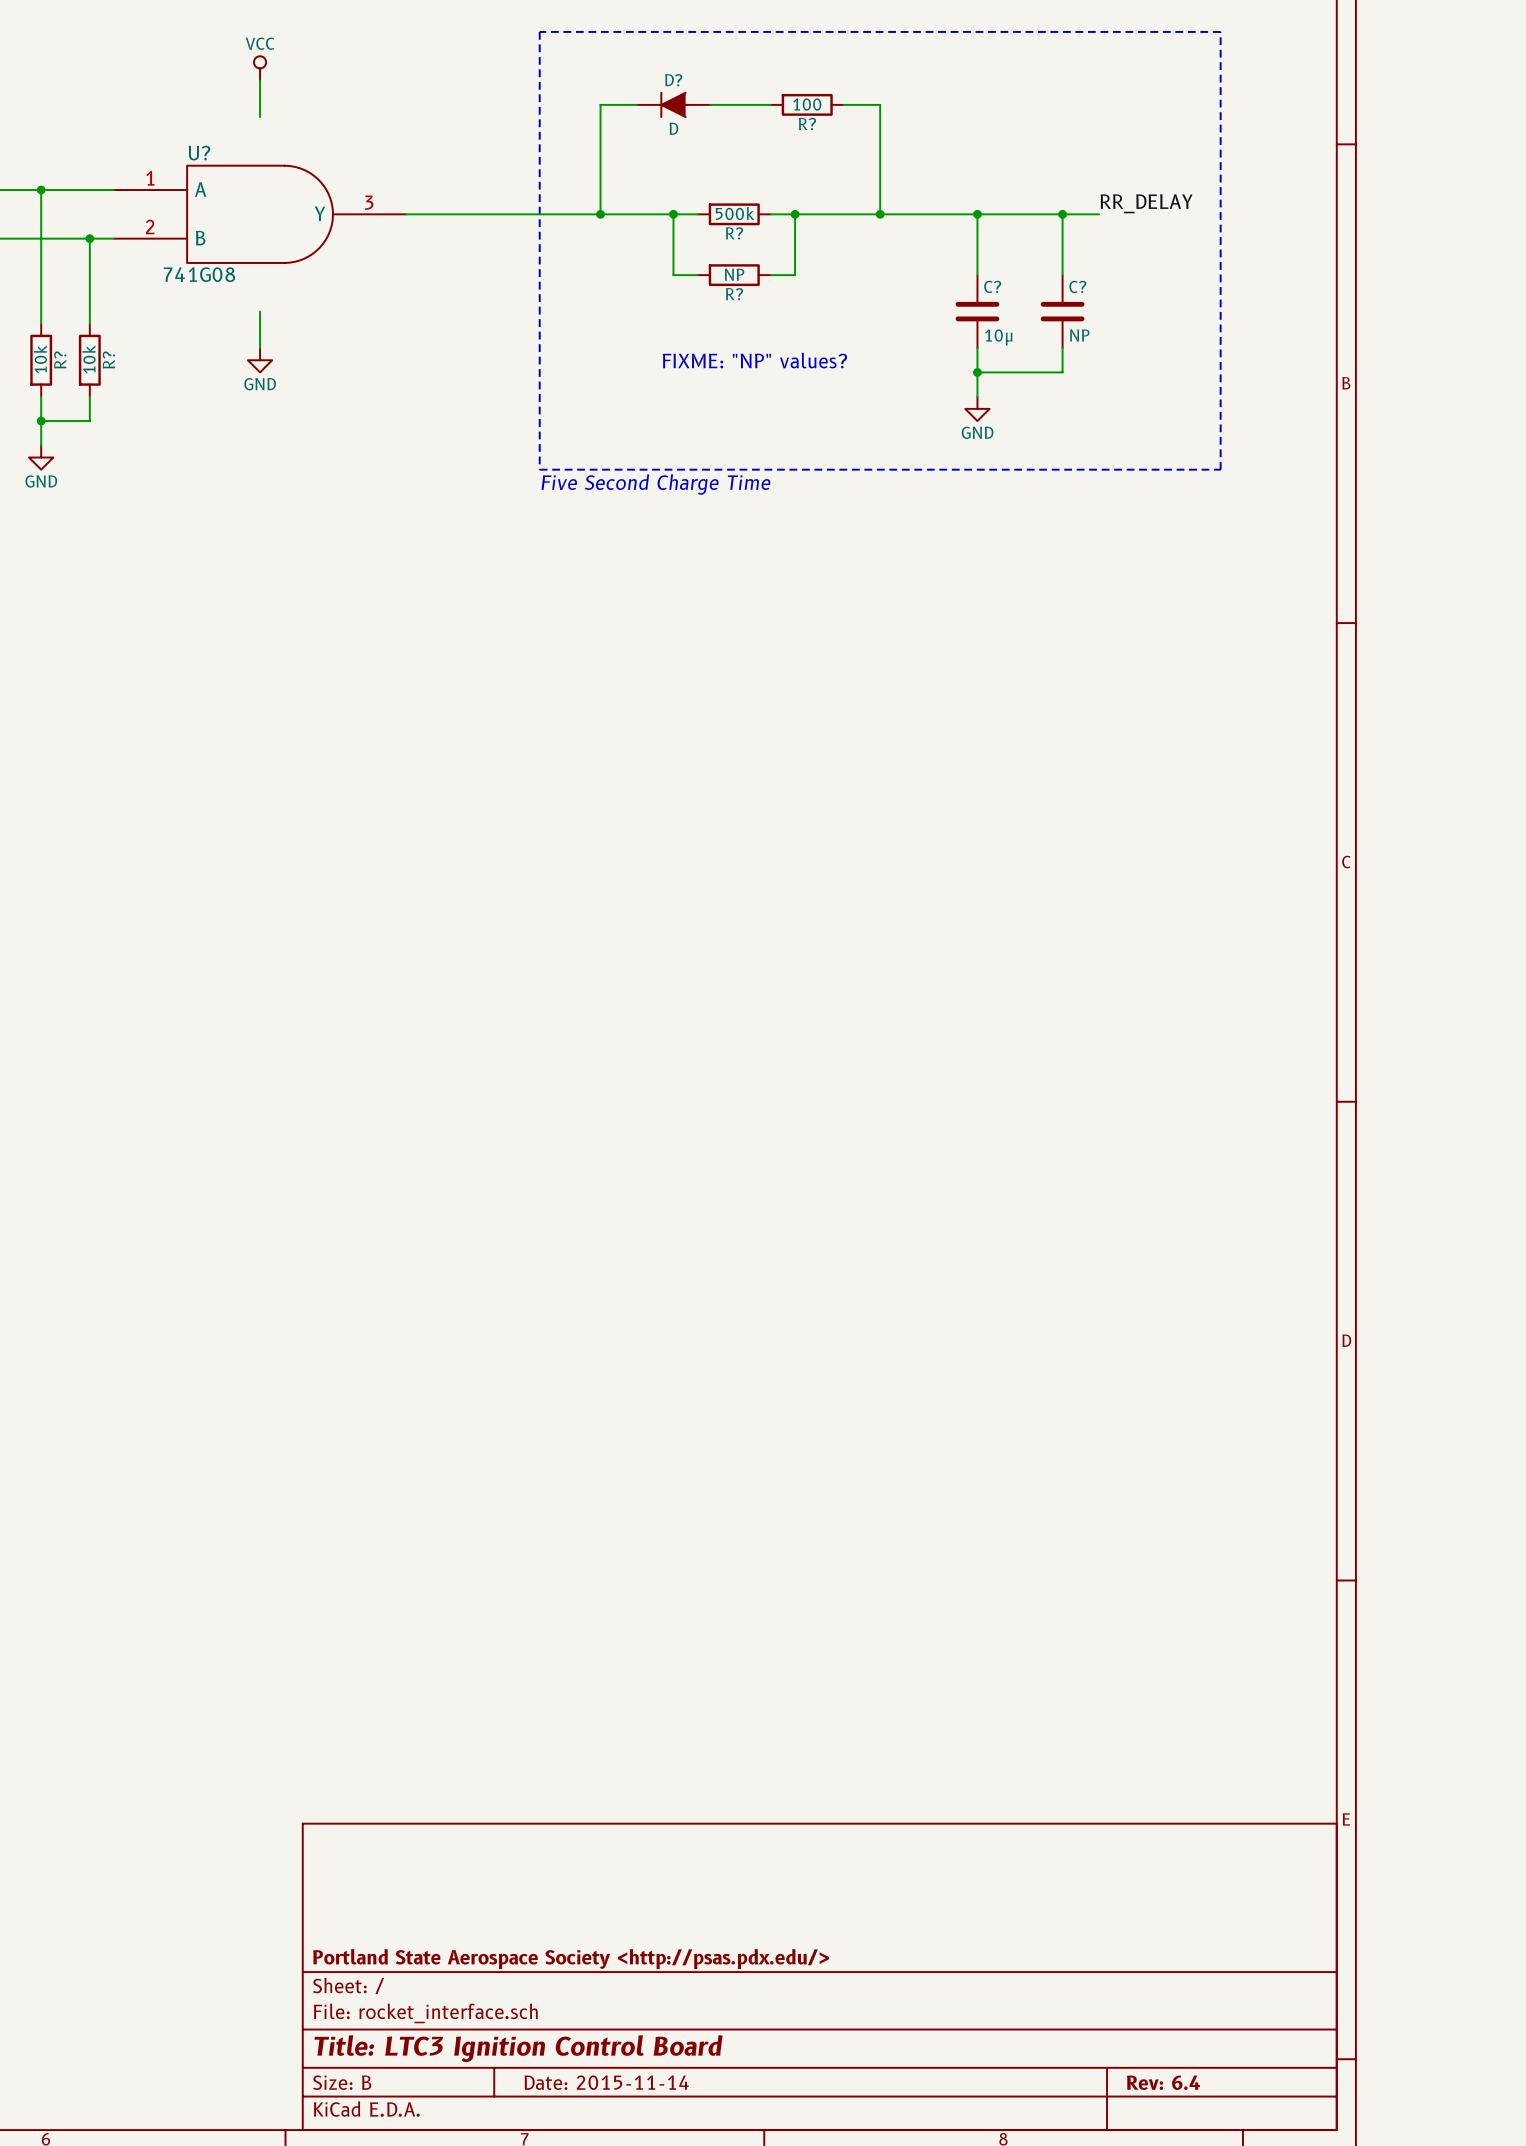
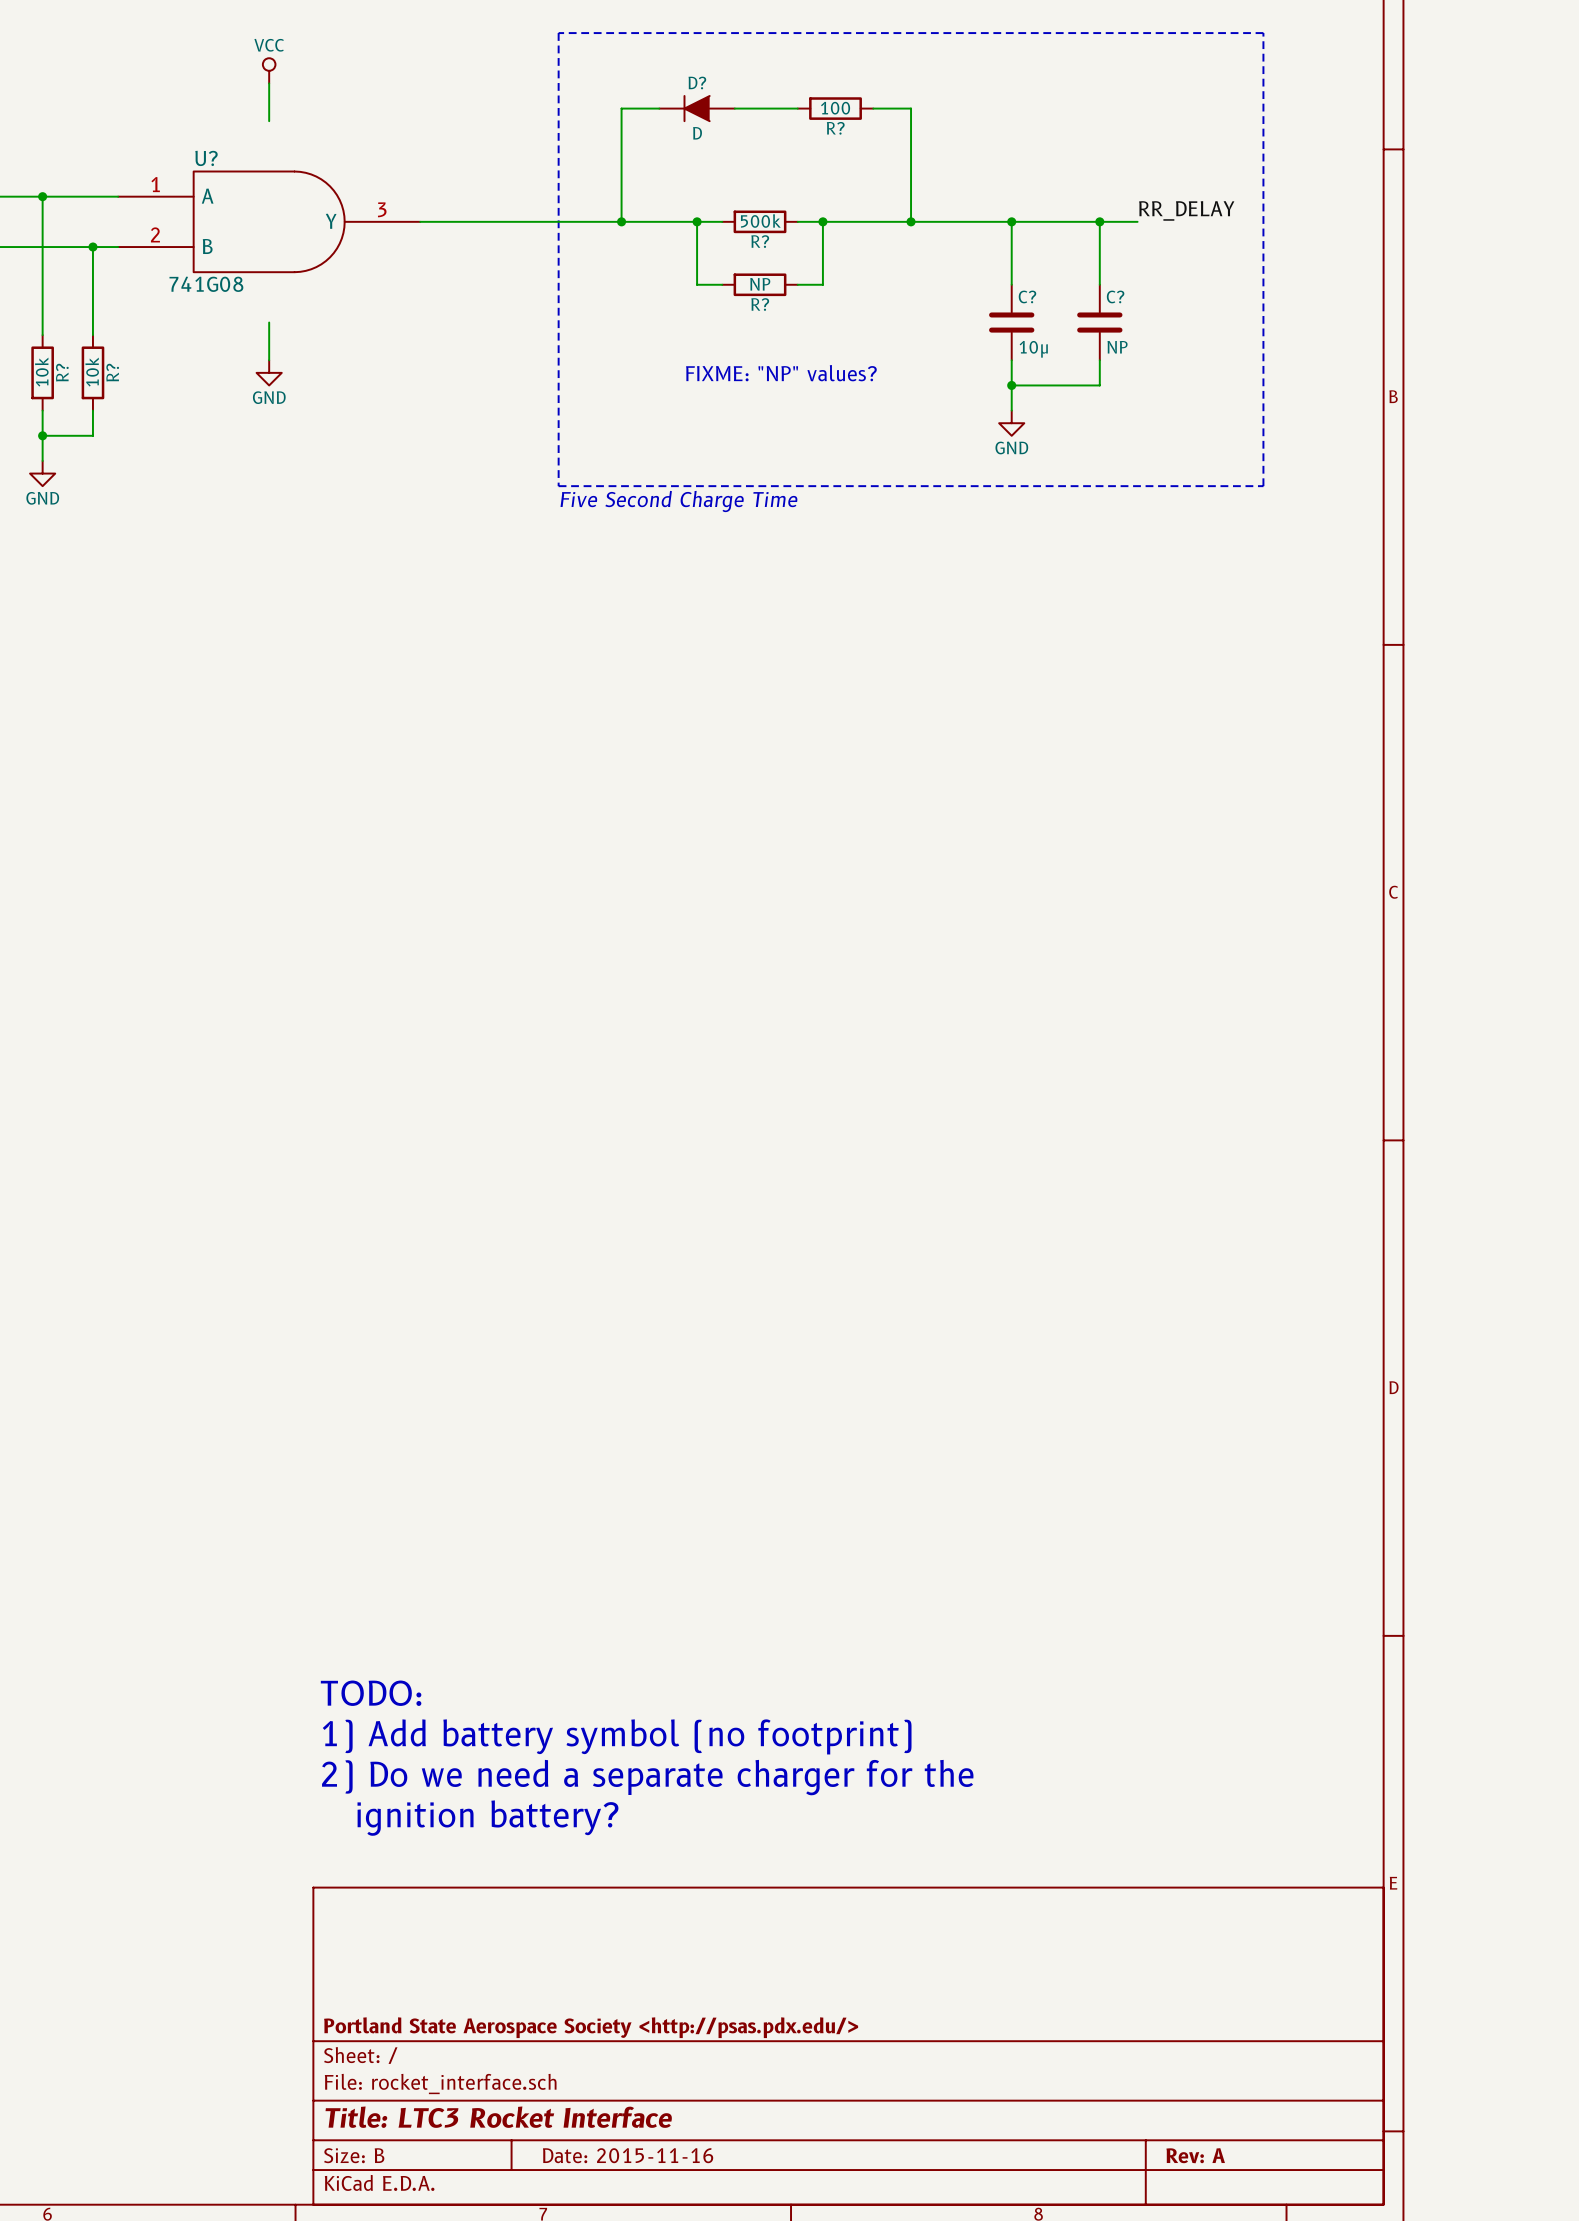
text: none -> TODO: (371, 1693)
text: none -> 1) Add battery symbol (no footprint) (617, 1736)
text: none -> 2) Do we need a separate charger for the (647, 1777)
text: none -> ignition battery? (487, 1818)
title block: Title: LTC3 Ignition Control Board (518, 2048) -> Title: LTC3 Rocket Interface (498, 2117)
title block: Date: 2015-11-14 (606, 2082) -> Date: 2015-11-16 (628, 2155)
title block: Rev: 6.4 (1163, 2082) -> Rev: A (1195, 2155)

